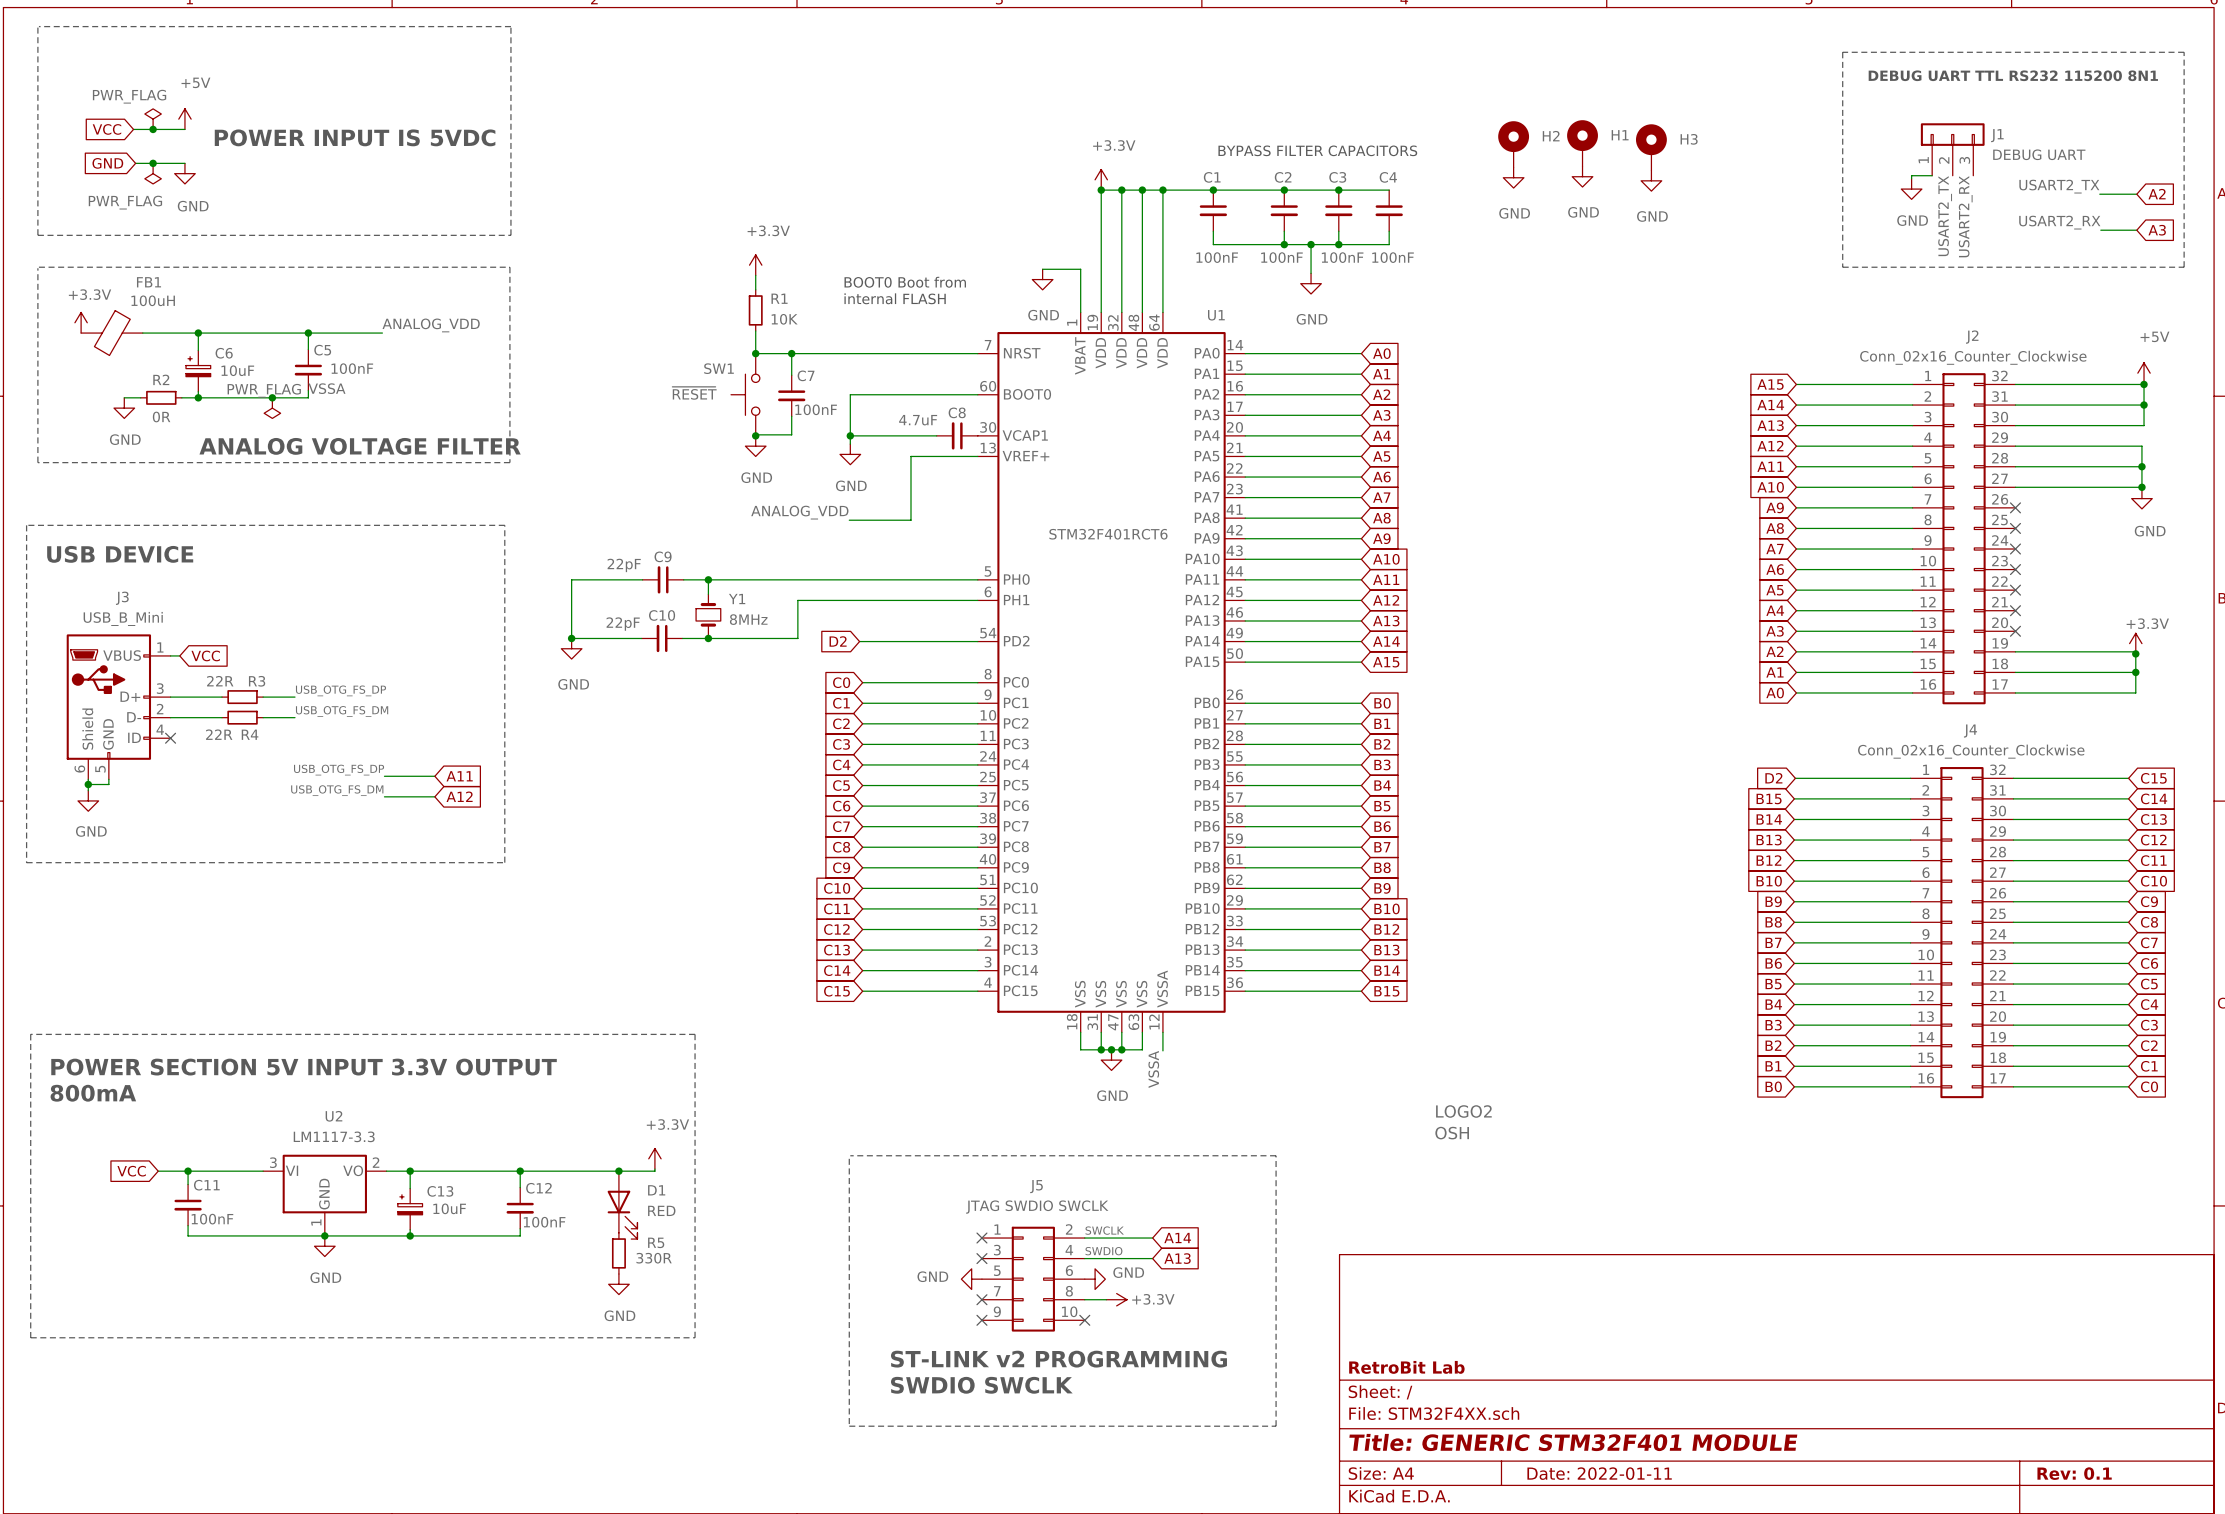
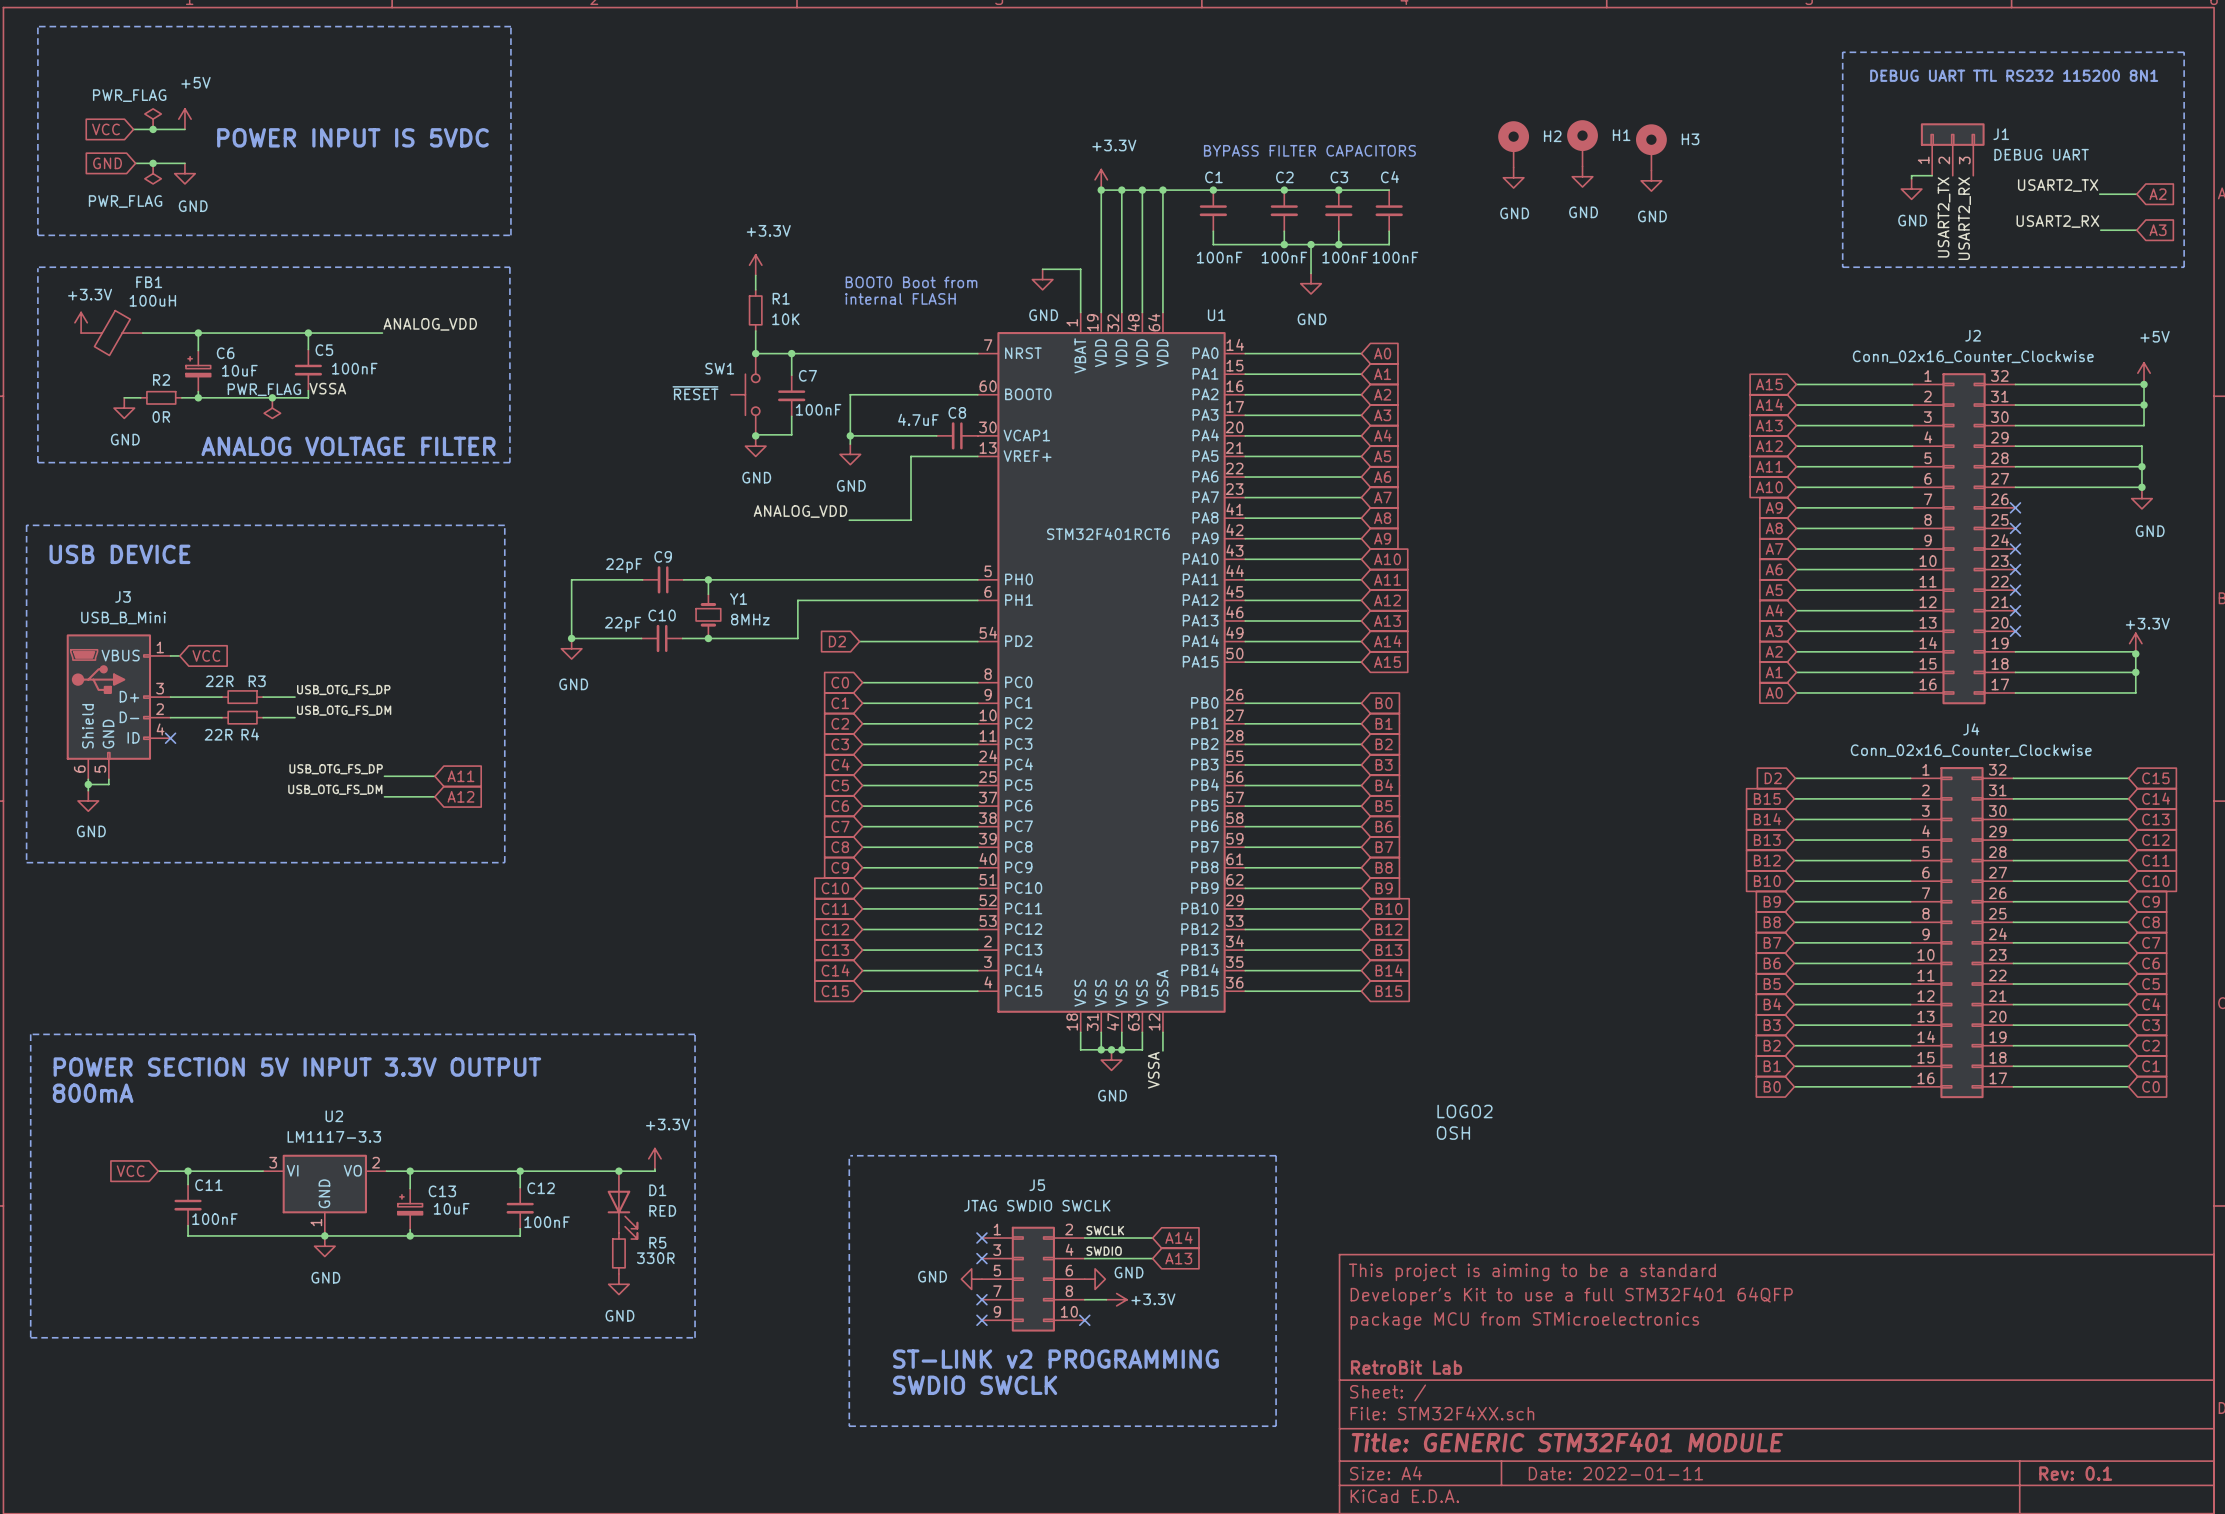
title block: none -> This project is aiming to be a standard (1532, 1272)
title block: none -> Developer's Kit to use a full STM32F401 64QFP (1571, 1296)
title block: none -> package MCU from STMicroelectronics (1524, 1320)

